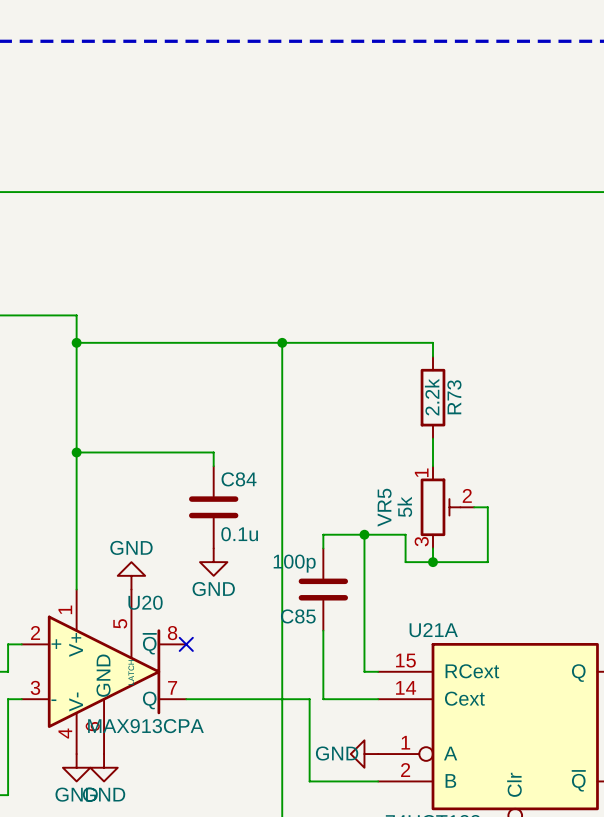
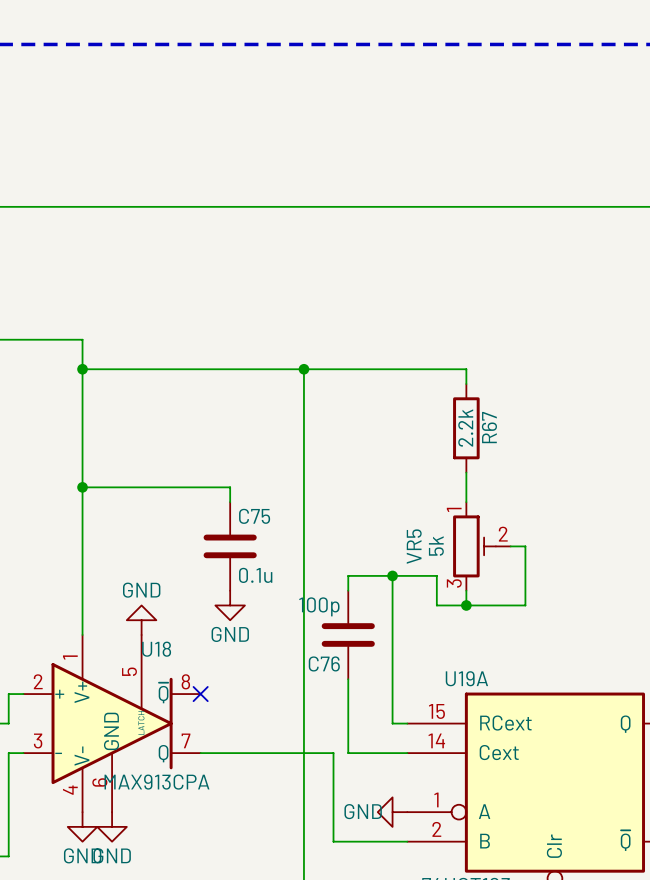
R73 name: R73 (454, 397) -> R67 (489, 427)
C84 name: C84 (239, 479) -> C75 (254, 516)
U20 name: U20 (145, 602) -> U18 (156, 649)
C85 name: C85 (298, 616) -> C76 (324, 663)
U21A name: U21A (433, 630) -> U19A (466, 678)

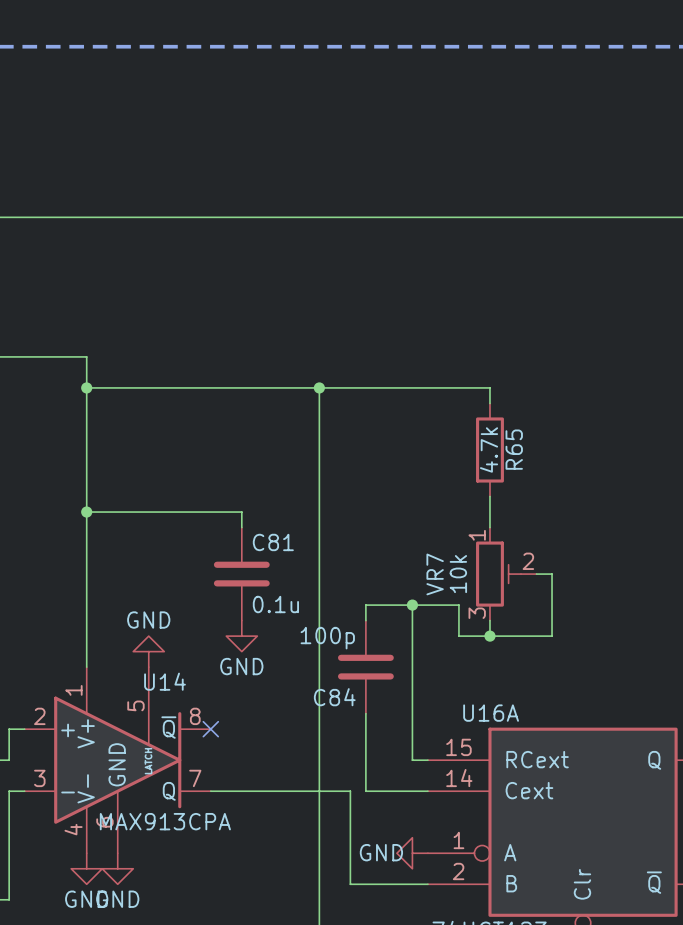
R67 name: R67 (489, 427) -> R65 (514, 449)
R67 value: 2.2k (465, 428) -> 4.7k (489, 449)
C75 name: C75 (254, 516) -> C81 (273, 542)
VR5 name: VR5 (414, 546) -> VR7 (435, 574)
VR5 value: 5k (436, 546) -> 10k (458, 574)
U18 name: U18 (156, 649) -> U14 (165, 681)
C76 name: C76 (324, 663) -> C84 (334, 697)
U19A name: U19A (466, 678) -> U16A (491, 713)

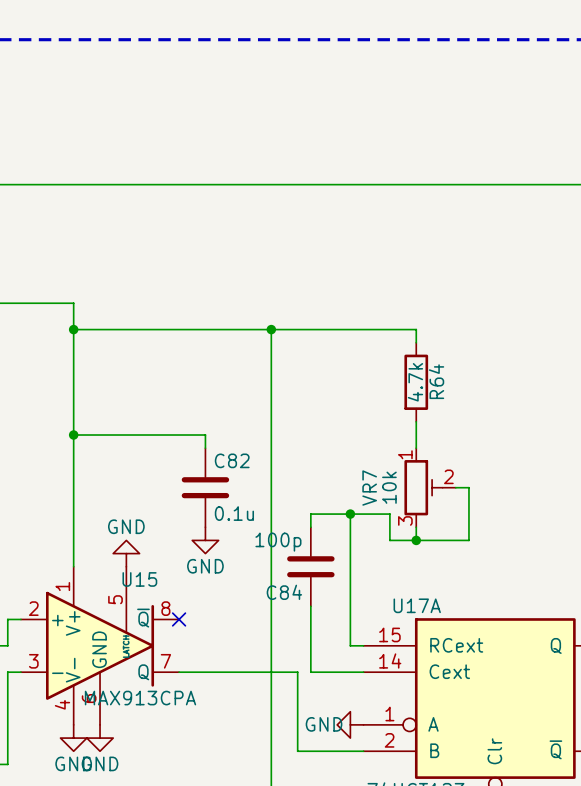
R65 name: R65 (514, 449) -> R64 (436, 381)
C81 name: C81 (273, 542) -> C82 (232, 460)
U14 name: U14 (165, 681) -> U15 (139, 579)
U16A name: U16A (491, 713) -> U17A (417, 605)

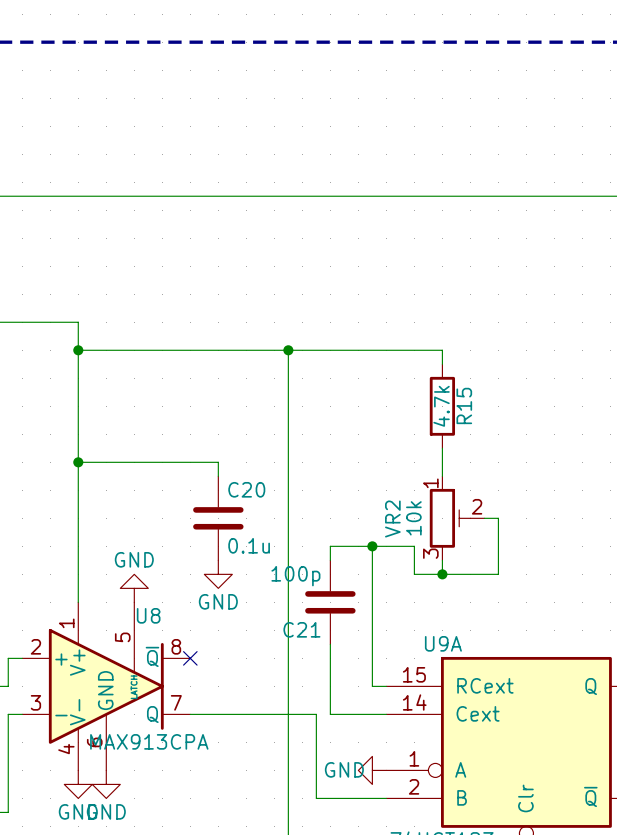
R64 name: R64 (436, 381) -> R15 (464, 405)
C82 name: C82 (232, 460) -> C20 (246, 489)
VR7 name: VR7 (369, 488) -> VR2 (392, 519)
U15 name: U15 (139, 579) -> U8 (148, 615)
C84 name: C84 (284, 592) -> C21 (301, 629)
U17A name: U17A (417, 605) -> U9A (443, 643)

